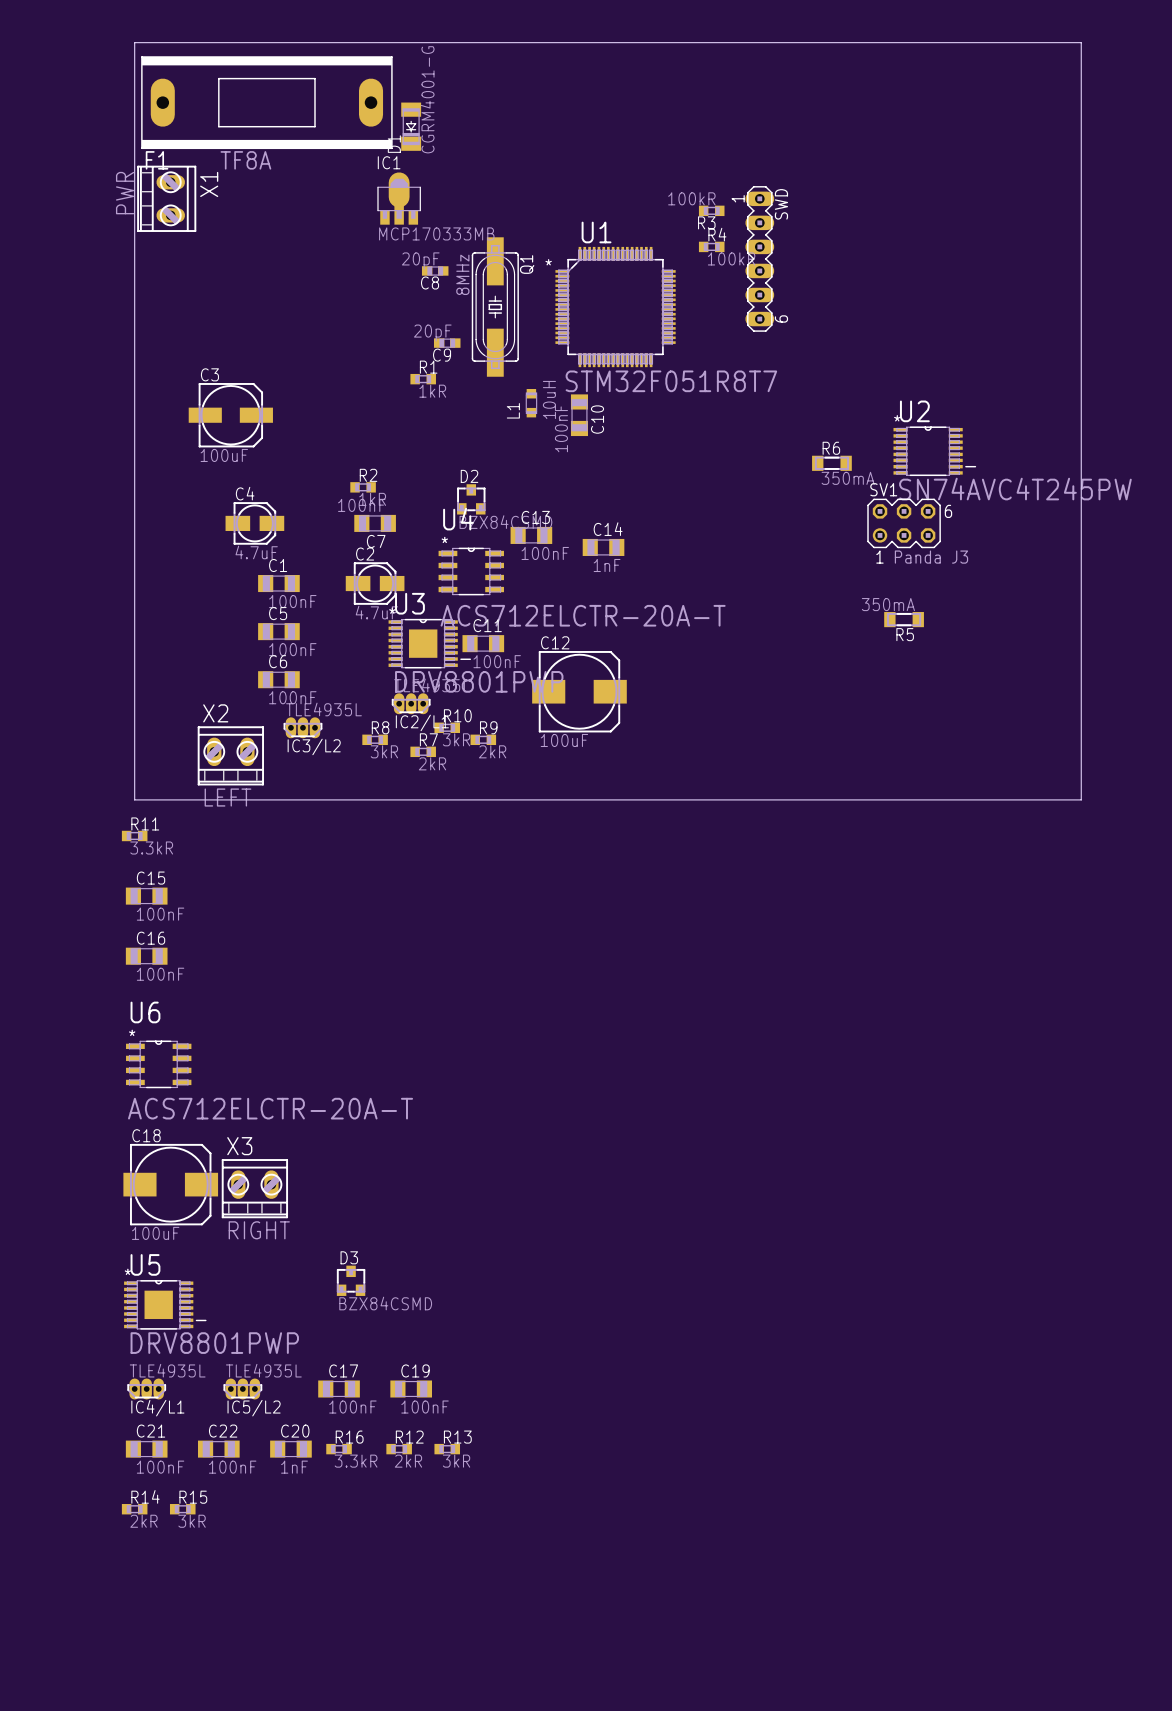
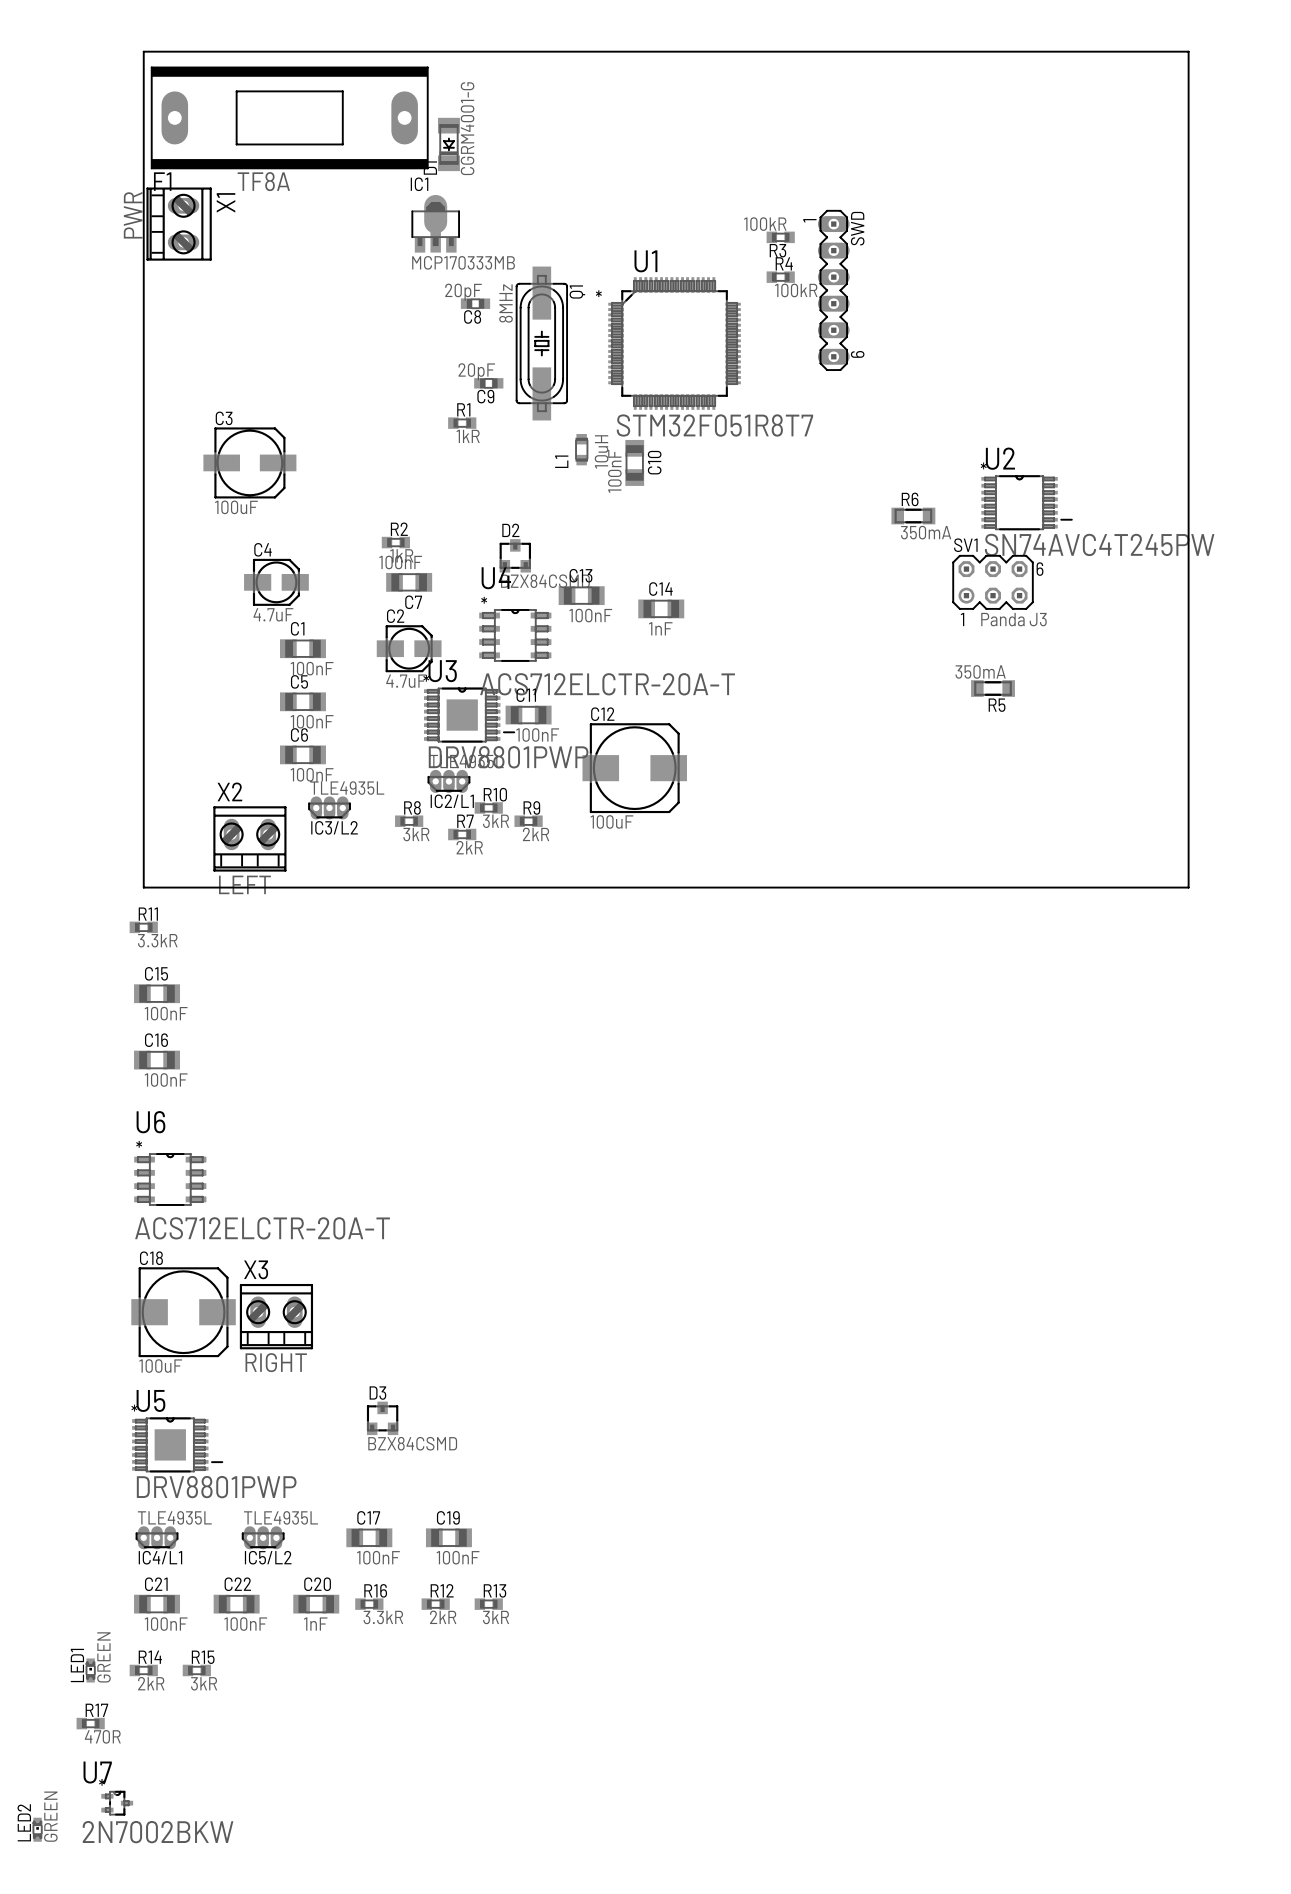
LED1: none -> GREEN (90, 1670)
R17: none -> 470R (90, 1723)
U7: none -> 2N7002BKW (117, 1803)
LED2: none -> GREEN (37, 1829)

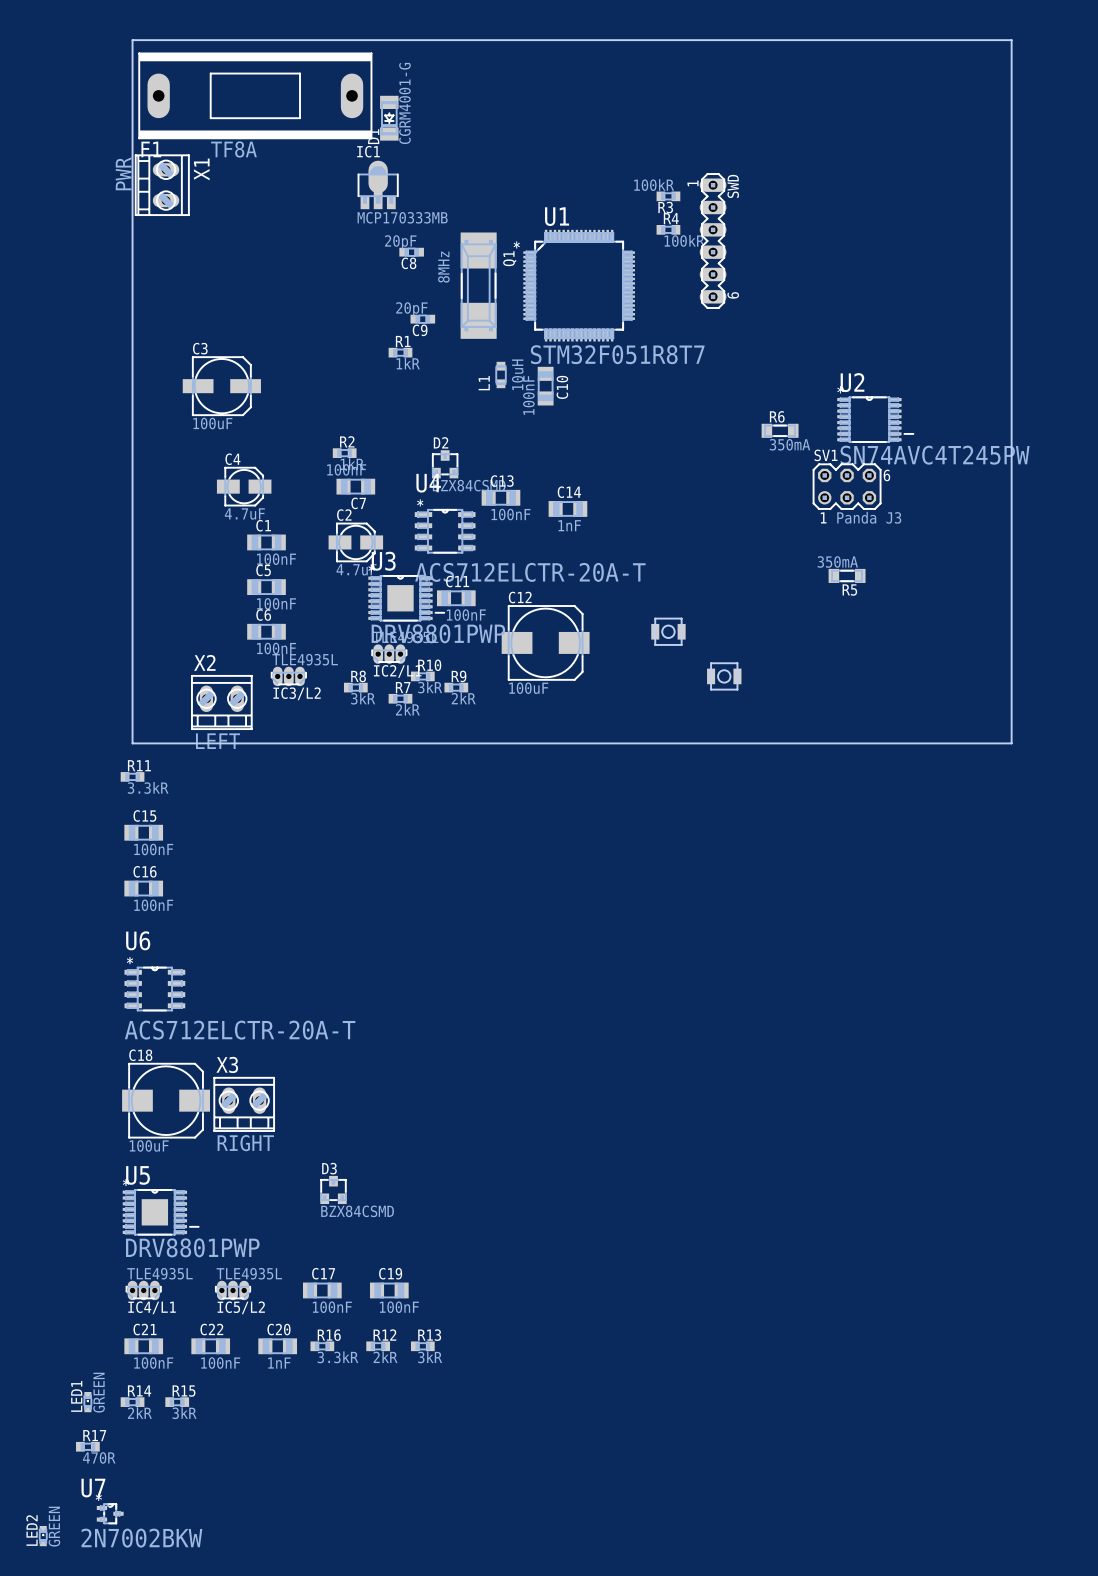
Q1 footprint: [515, 266, 568, 421] -> [460, 232, 497, 339]
part: none -> (668, 631)
part: none -> (724, 676)

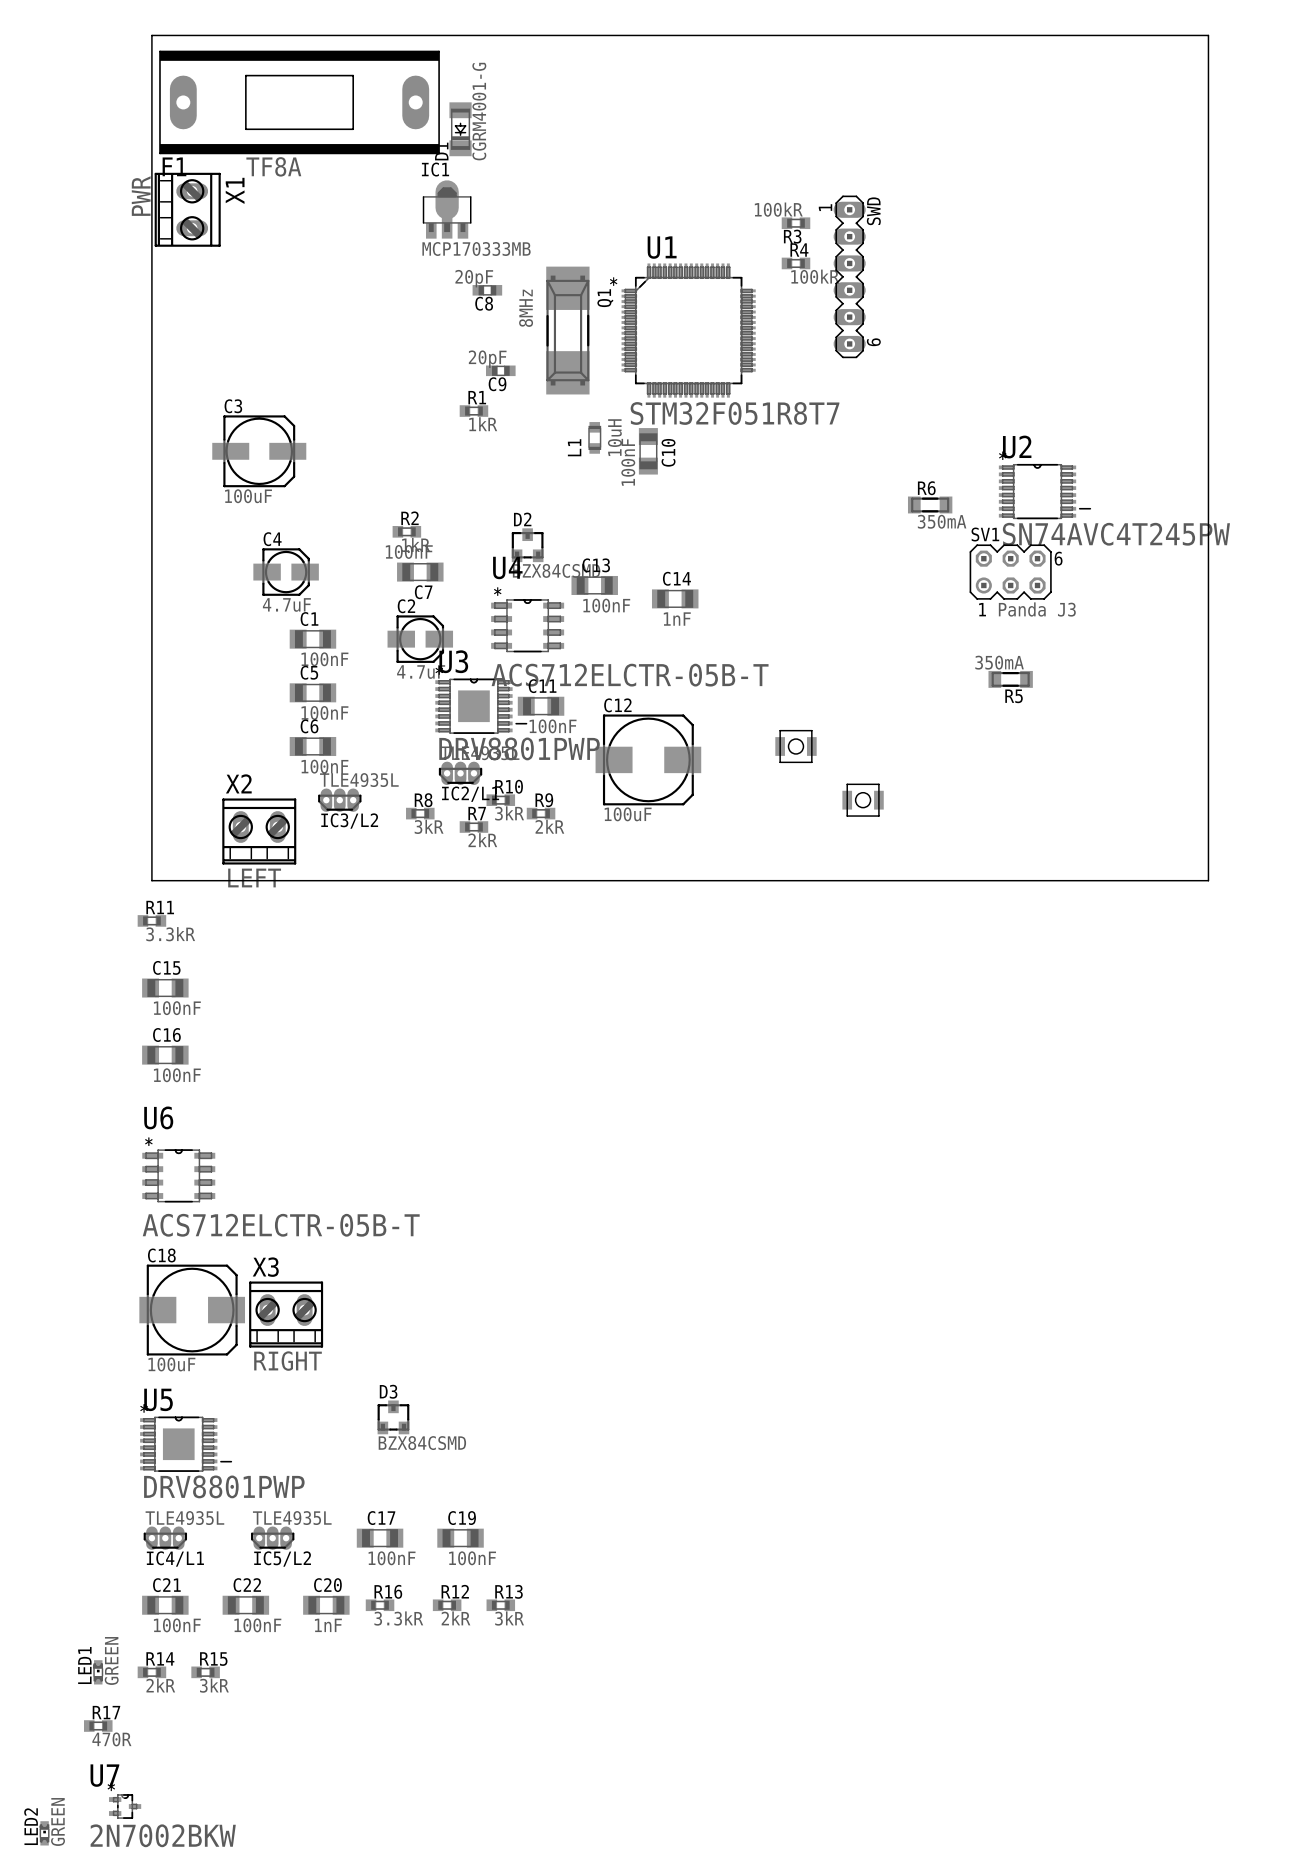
U4 value: ACS712ELCTR-20A-T (530, 572) -> ACS712ELCTR-05B-T (630, 675)
U6 value: ACS712ELCTR-20A-T (240, 1030) -> ACS712ELCTR-05B-T (281, 1225)

